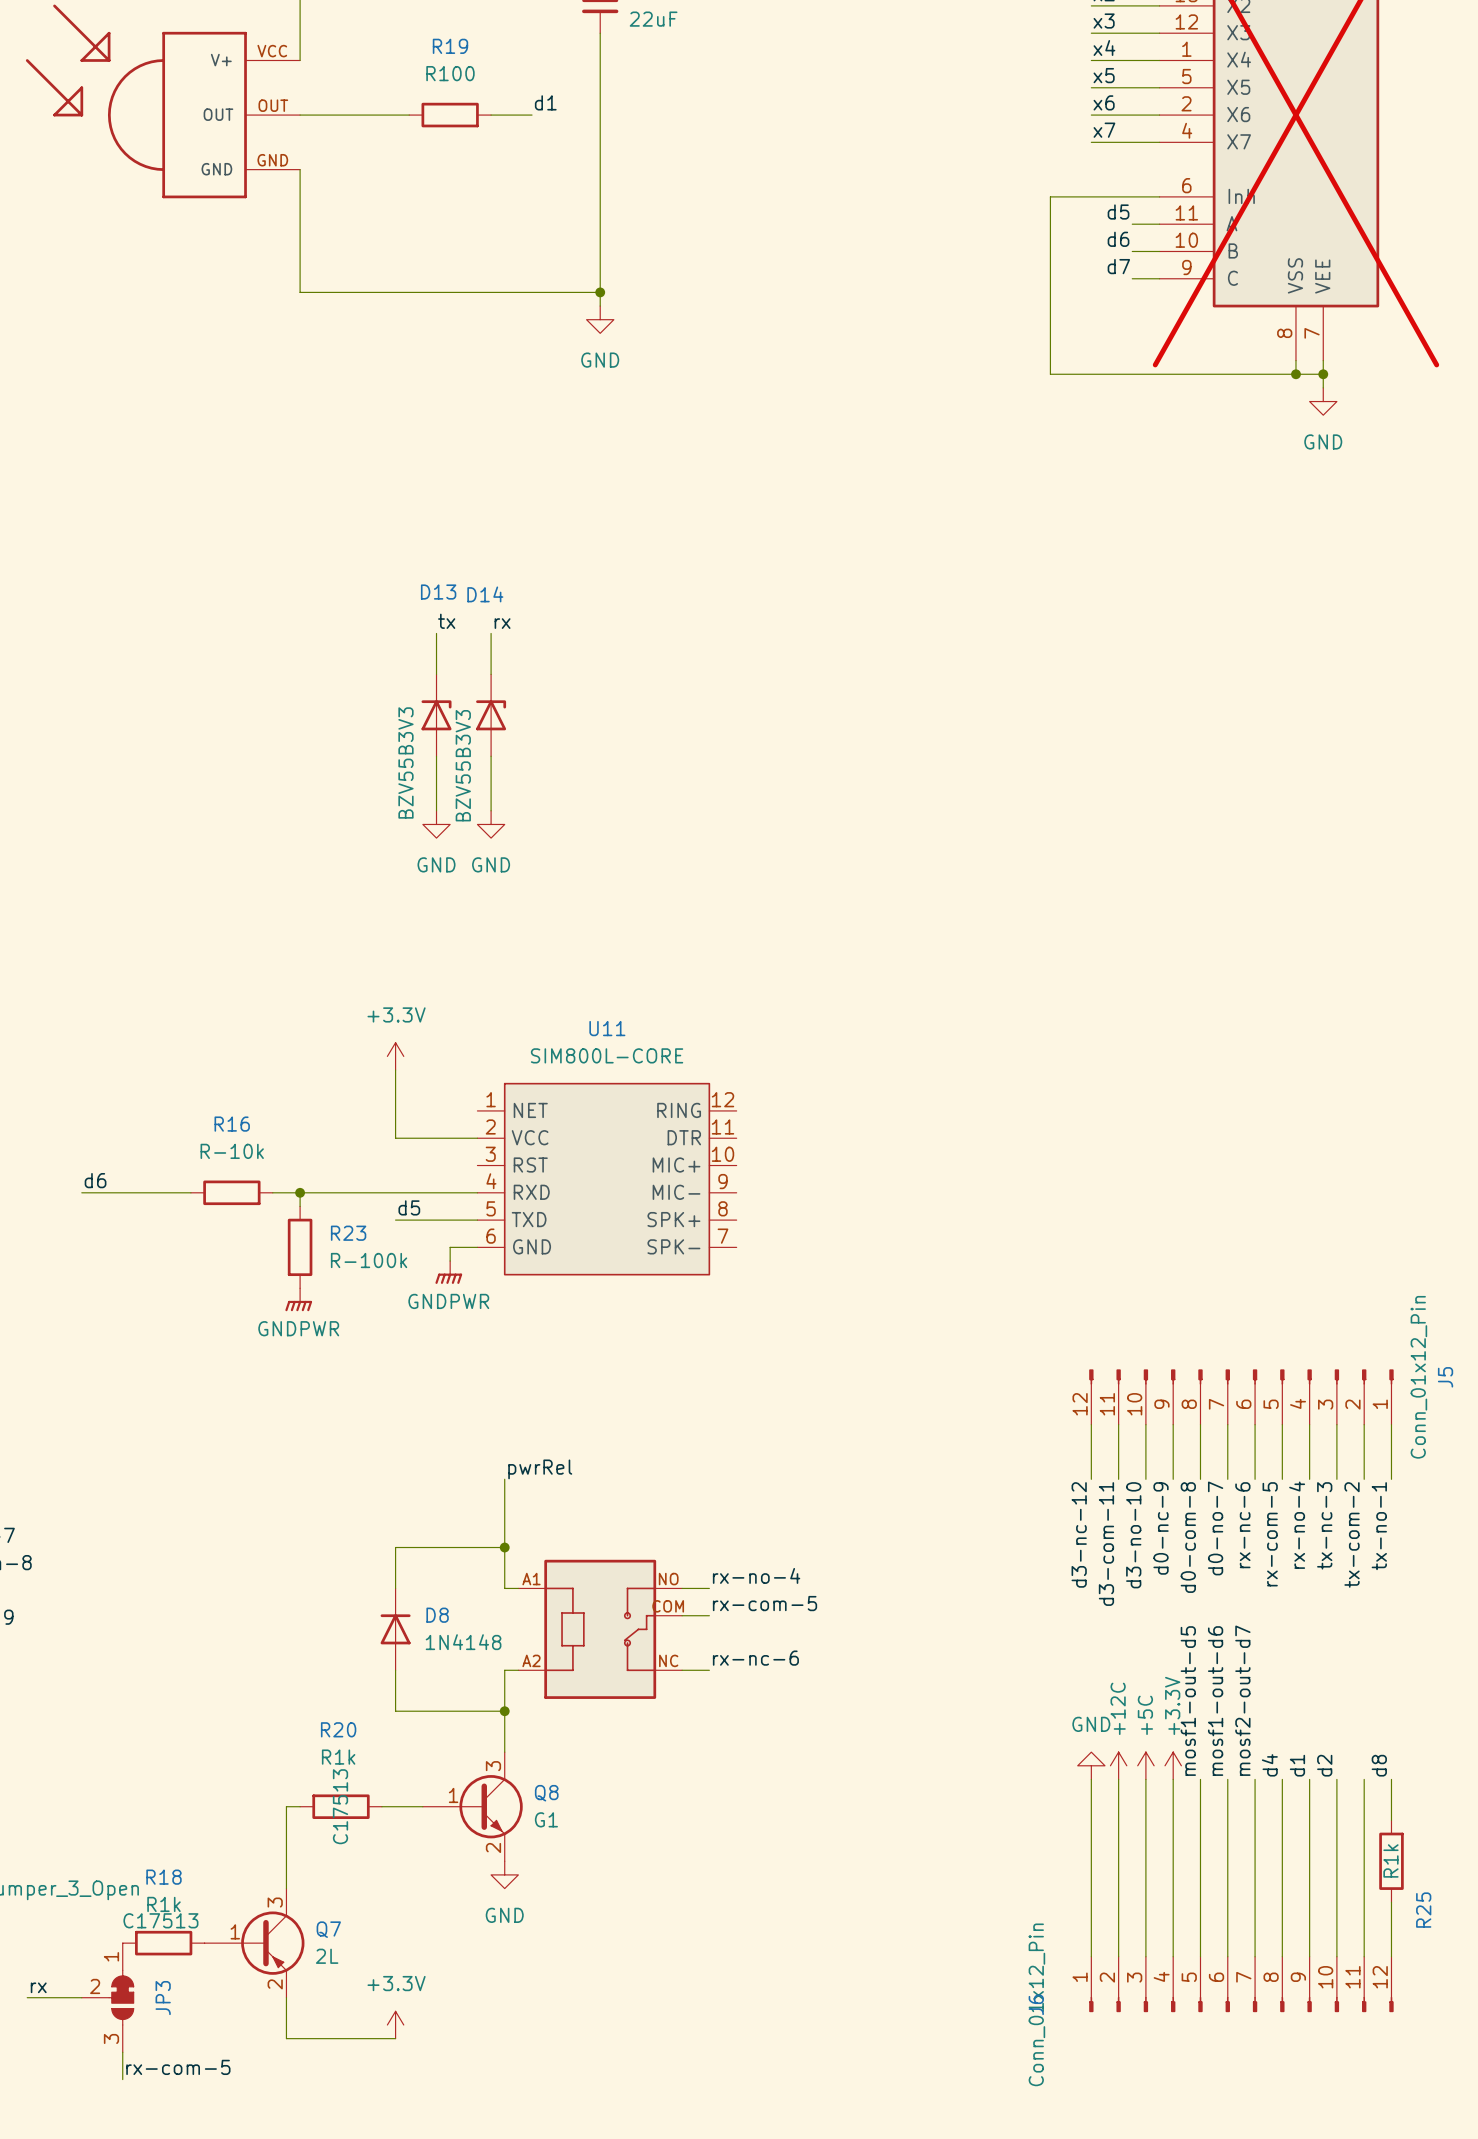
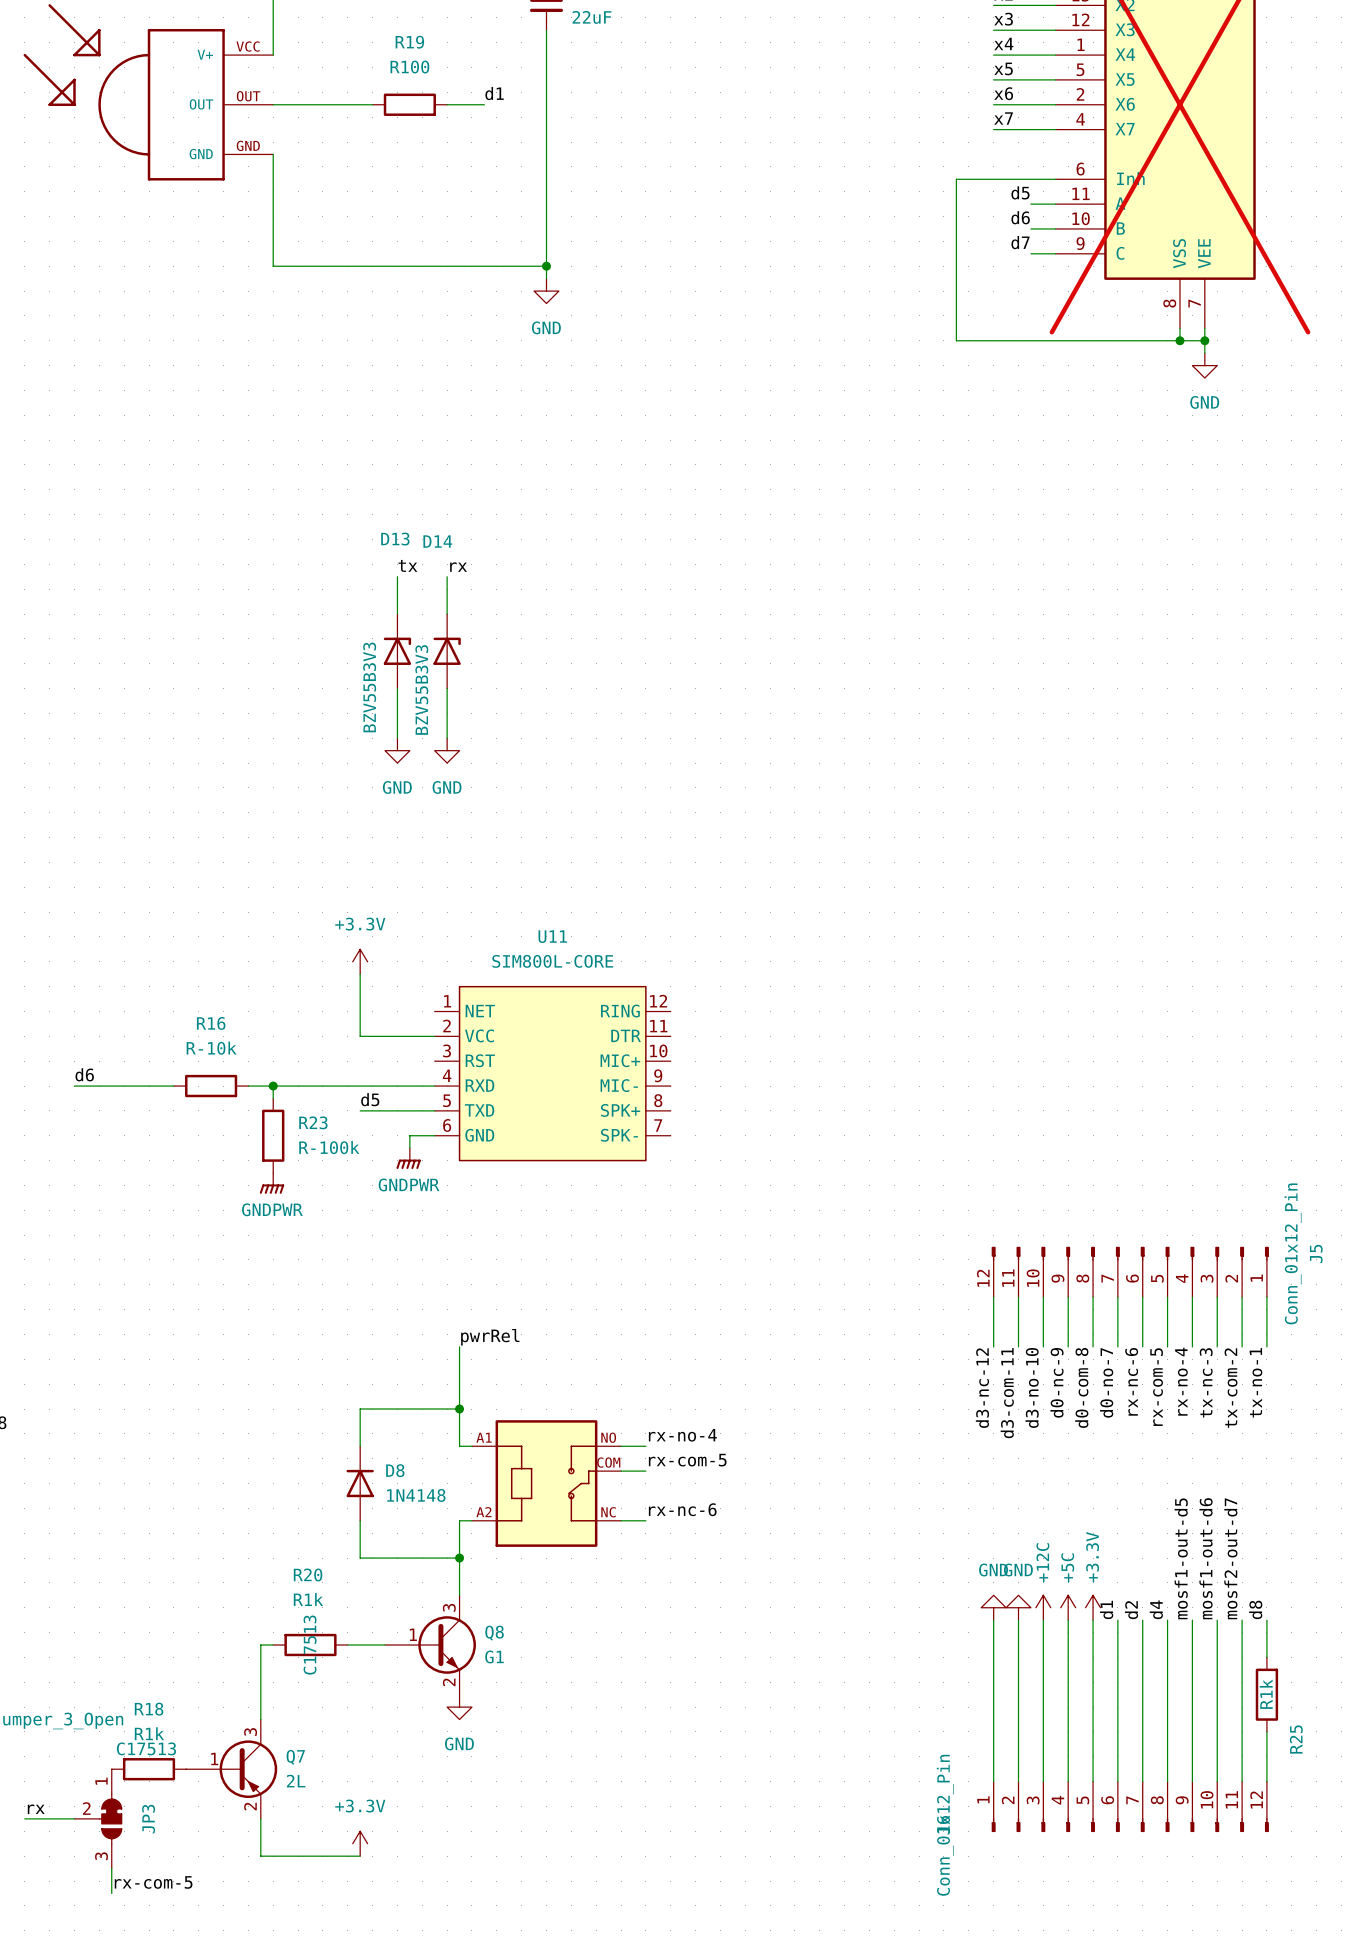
label: mosf2-out-d7 (1242, 1700) -> d2 (1131, 1610)
label: none -> mosf2-out-d7 (1230, 1558)
label: mosf1-out-d5 (1188, 1701) -> none
label: mosf1-out-d6 (1215, 1701) -> d1 (1106, 1609)
power symbol: +12C (1118, 1765) -> GND (1018, 1607)
power symbol: +5C (1145, 1765) -> +12C (1043, 1607)
power symbol: +3.3V (1173, 1765) -> +5C (1068, 1607)
power symbol: none -> +3.3V (1093, 1607)
label: d1 (1297, 1765) -> mosf1-out-d5 (1181, 1558)
label: d2 (1324, 1765) -> mosf1-out-d6 (1206, 1558)

